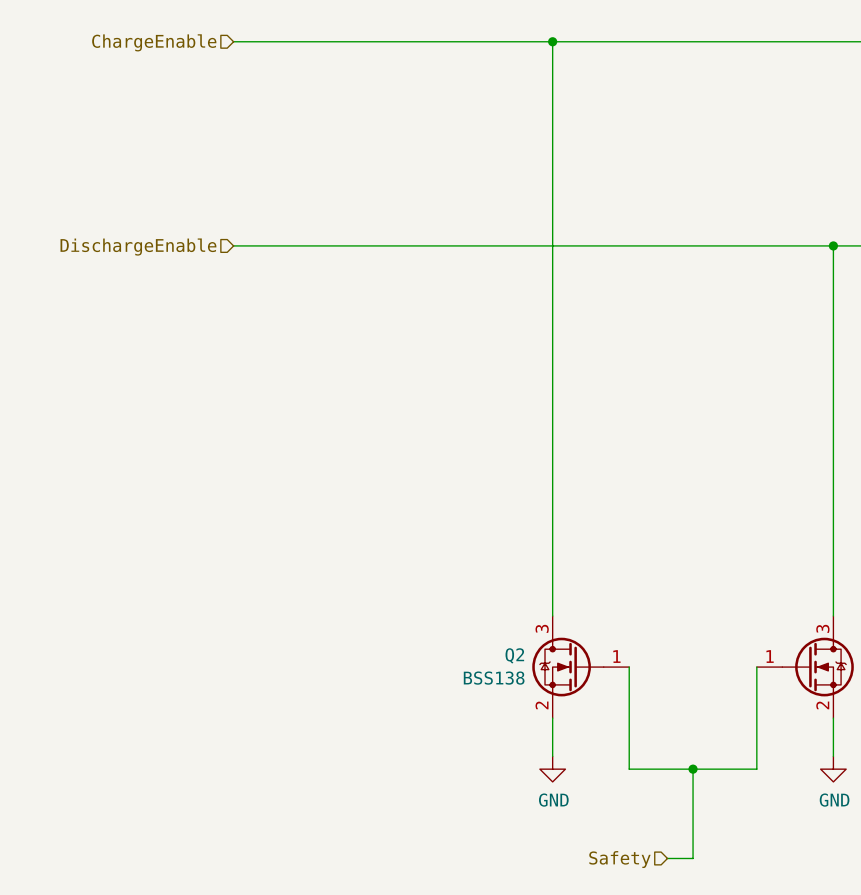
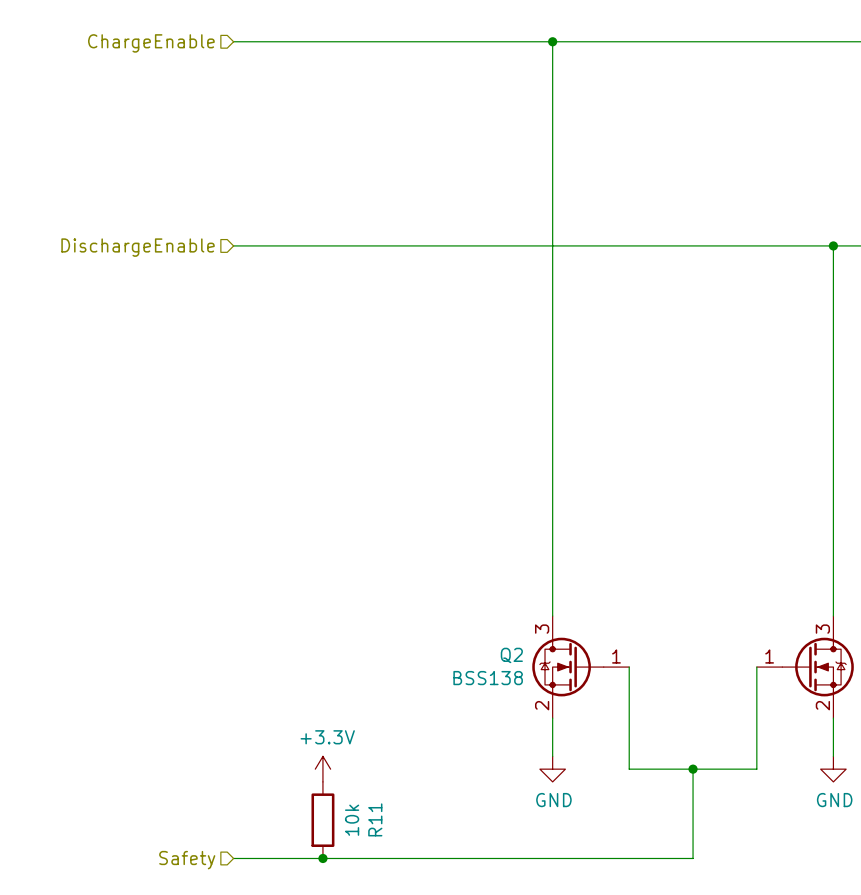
power symbol: none -> +3.3V (322, 769)
R11: none -> 10k (322, 820)
wire: none -> (233, 858) (667, 858)
junction: none -> (322, 858)
hierarchical label: none -> Safety (187, 860)
hierarchical label: Safety (619, 859) -> none

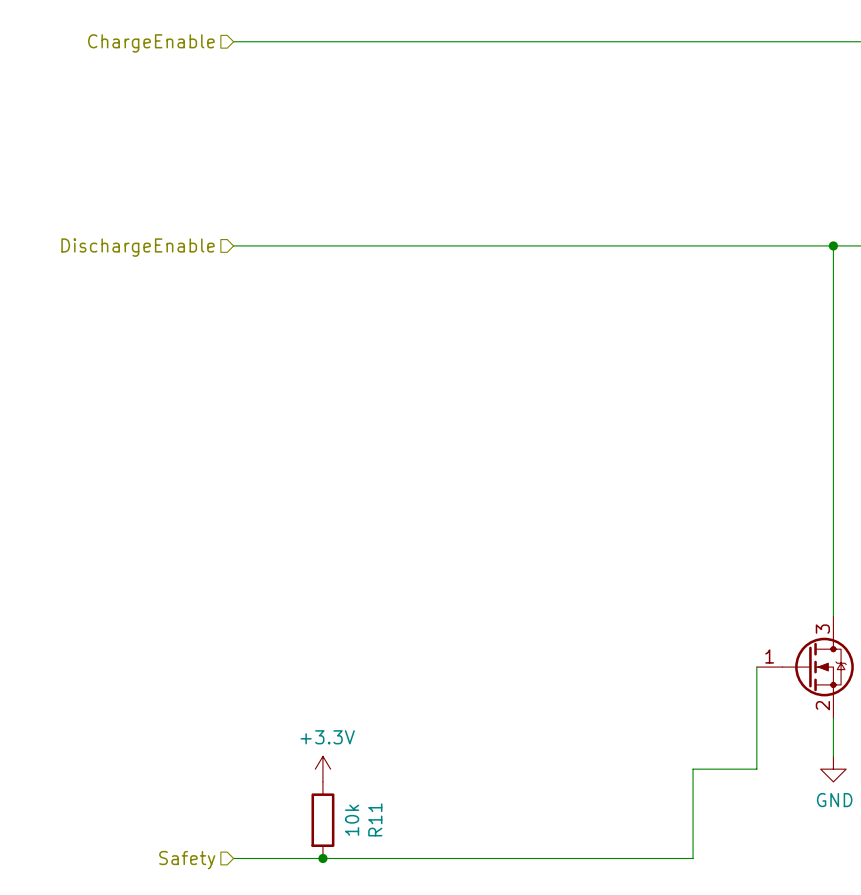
wire: (552, 41) (552, 616) -> none
junction: (552, 41) -> none
Q2: BSS138 (580, 667) -> none
wire: (629, 667) (629, 769) (693, 769) -> none
wire: (552, 718) (552, 756) -> none
power symbol: GND (552, 769) -> none
junction: (693, 769) -> none

